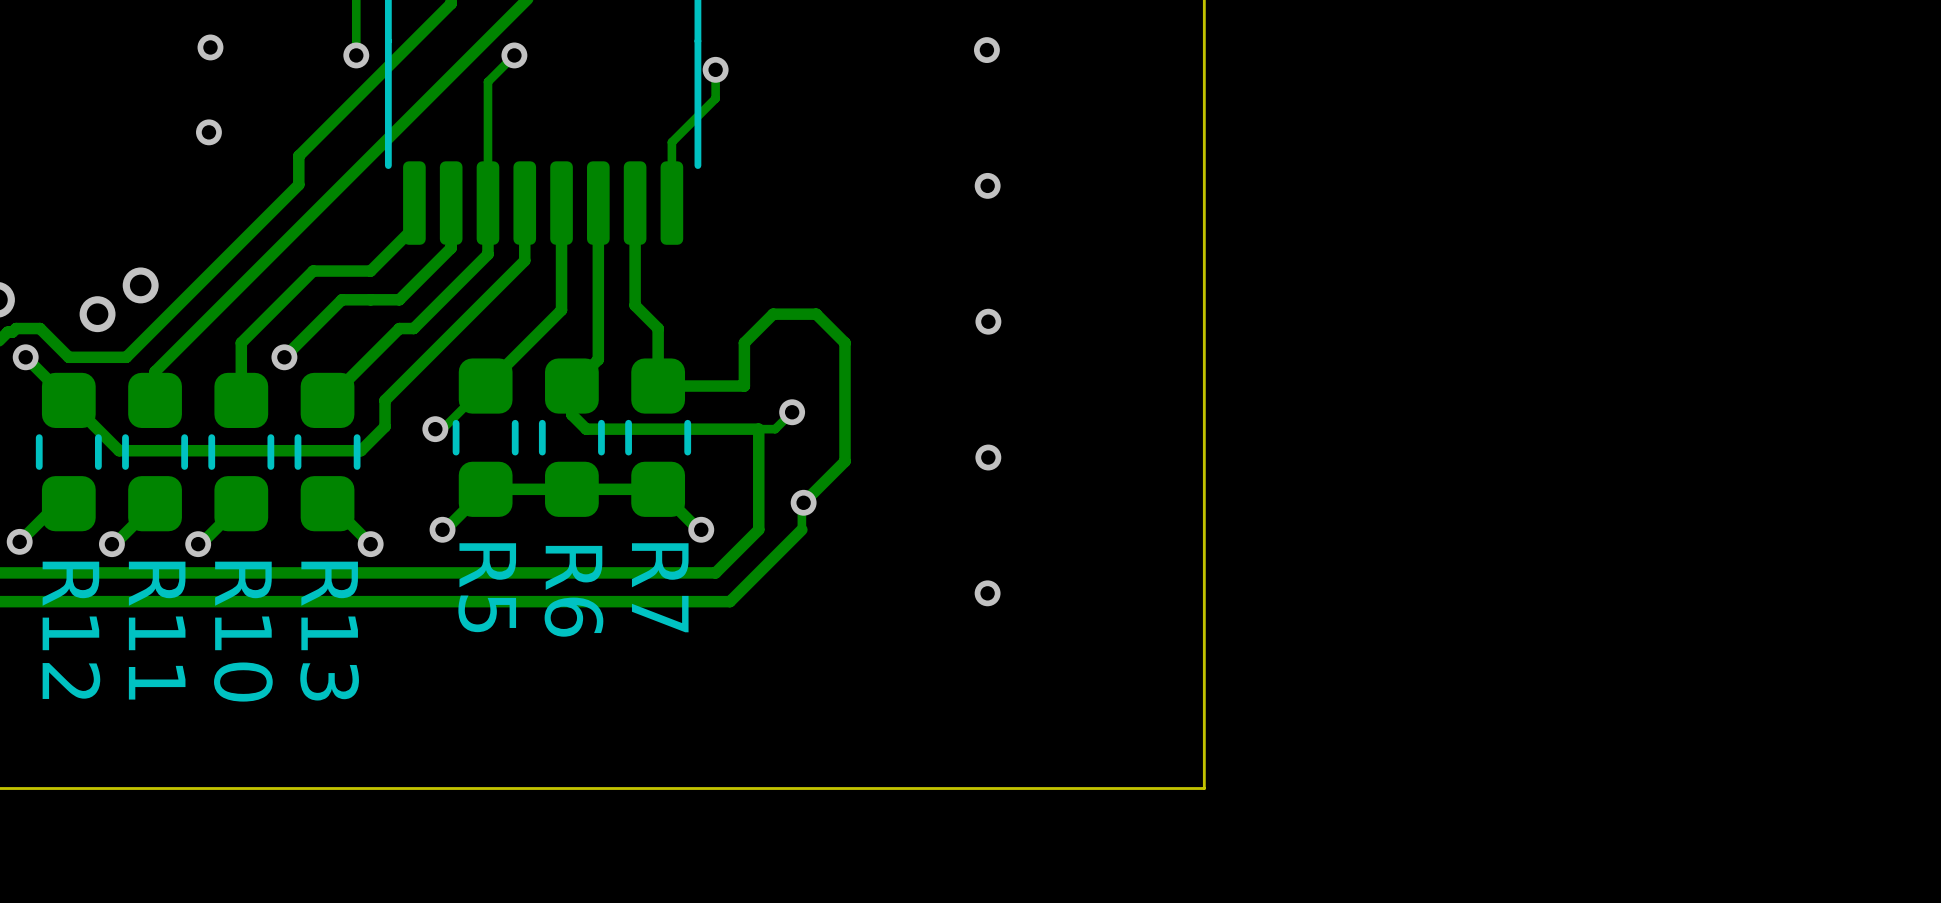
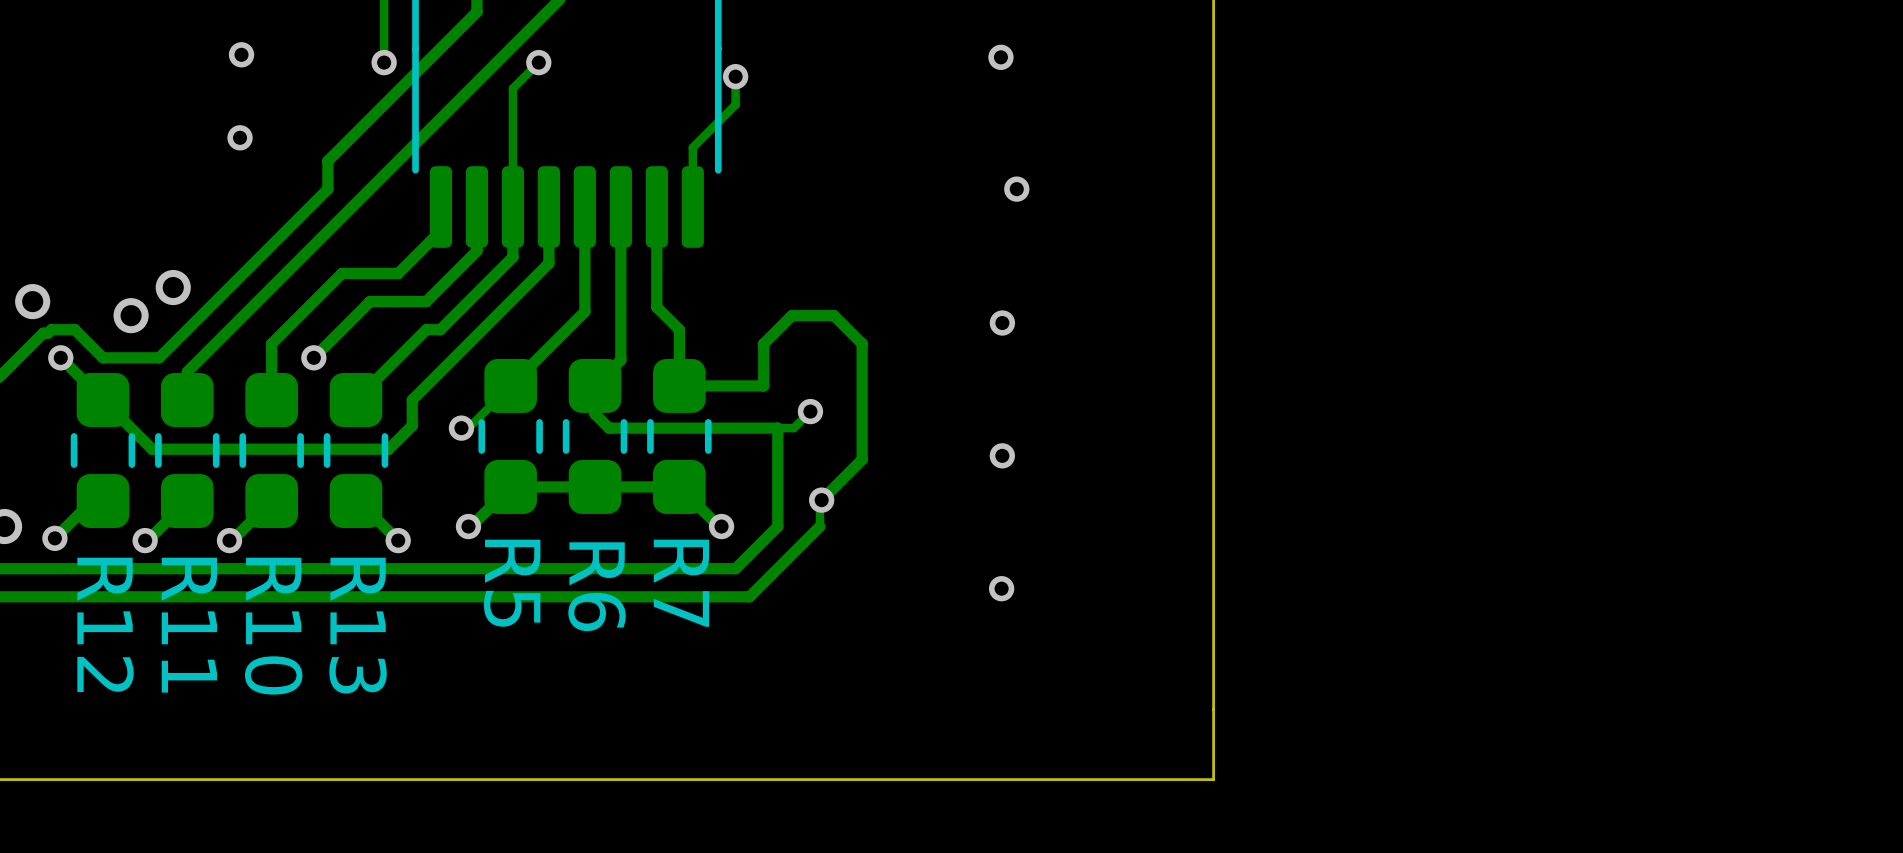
via position: (987, 185) -> (1016, 189)

